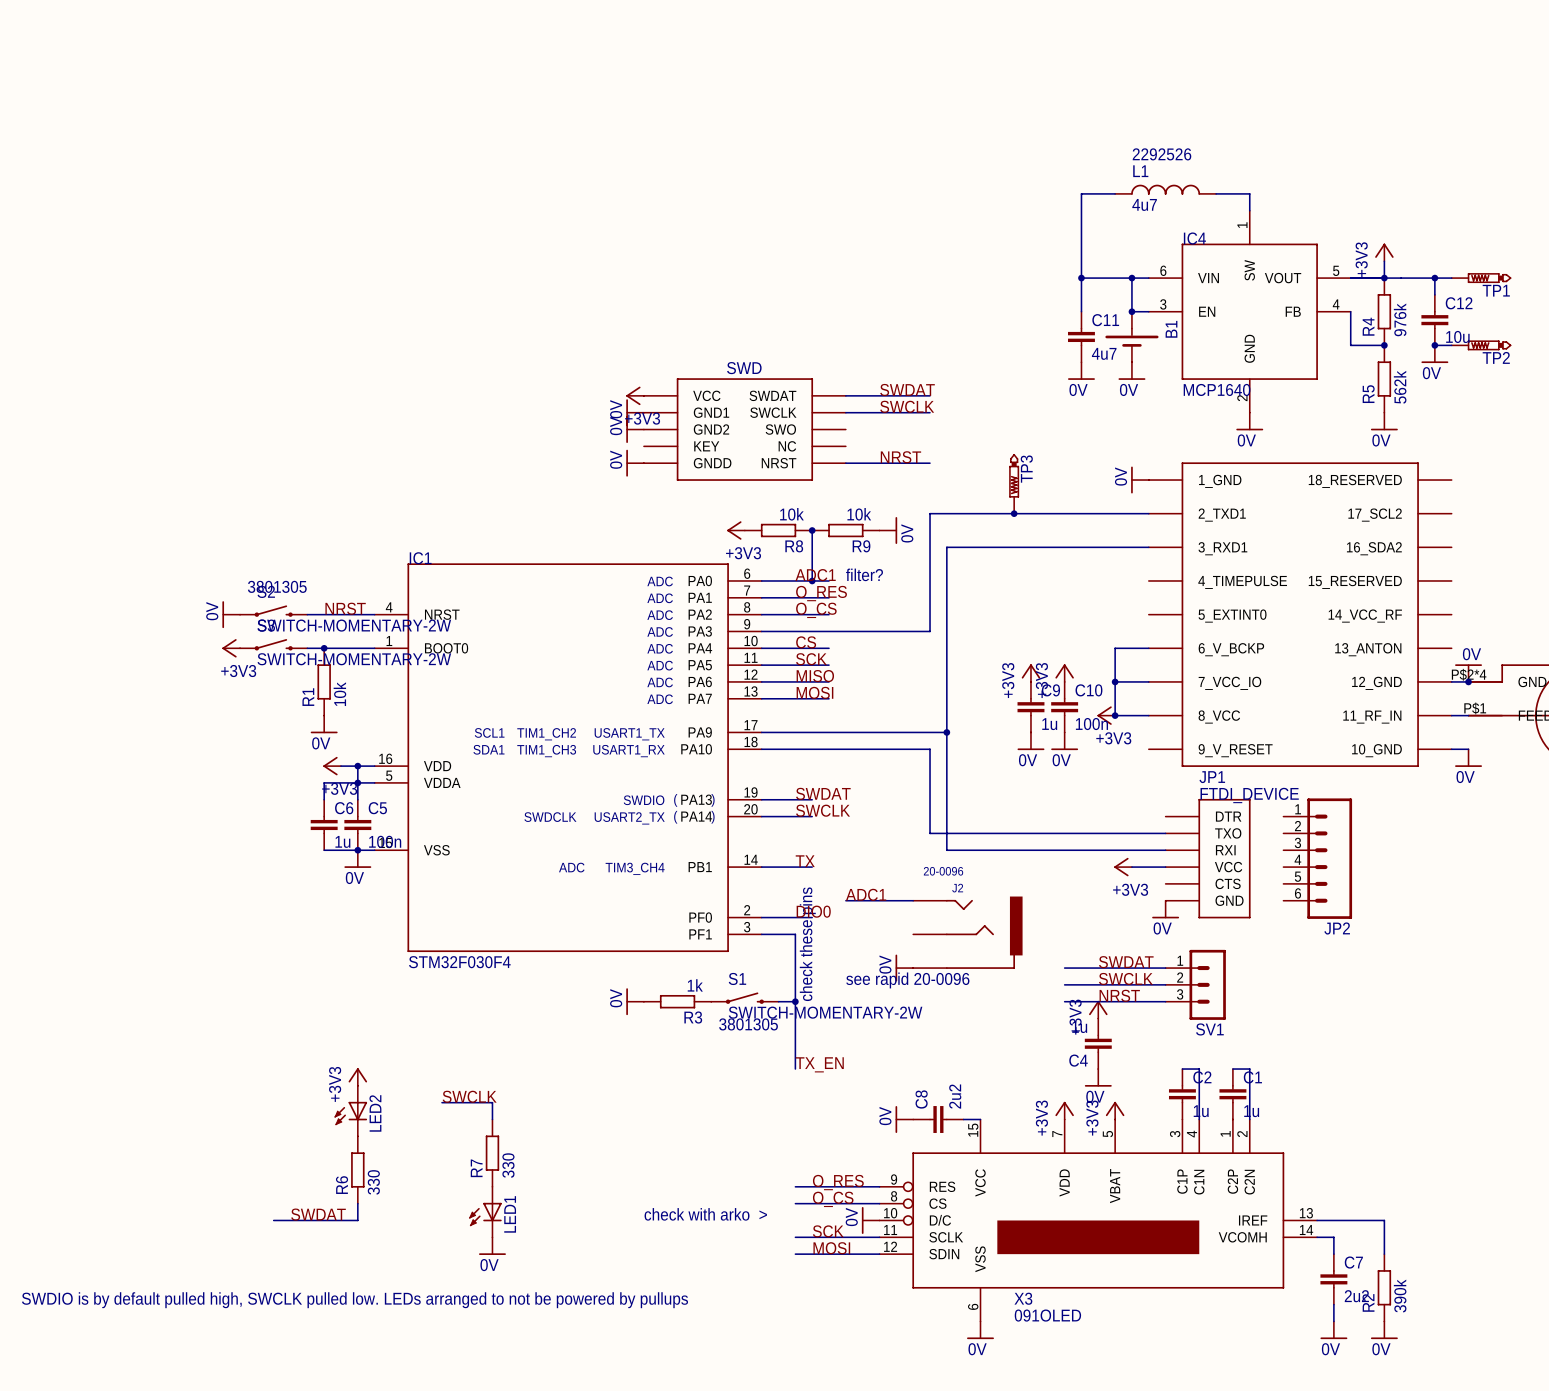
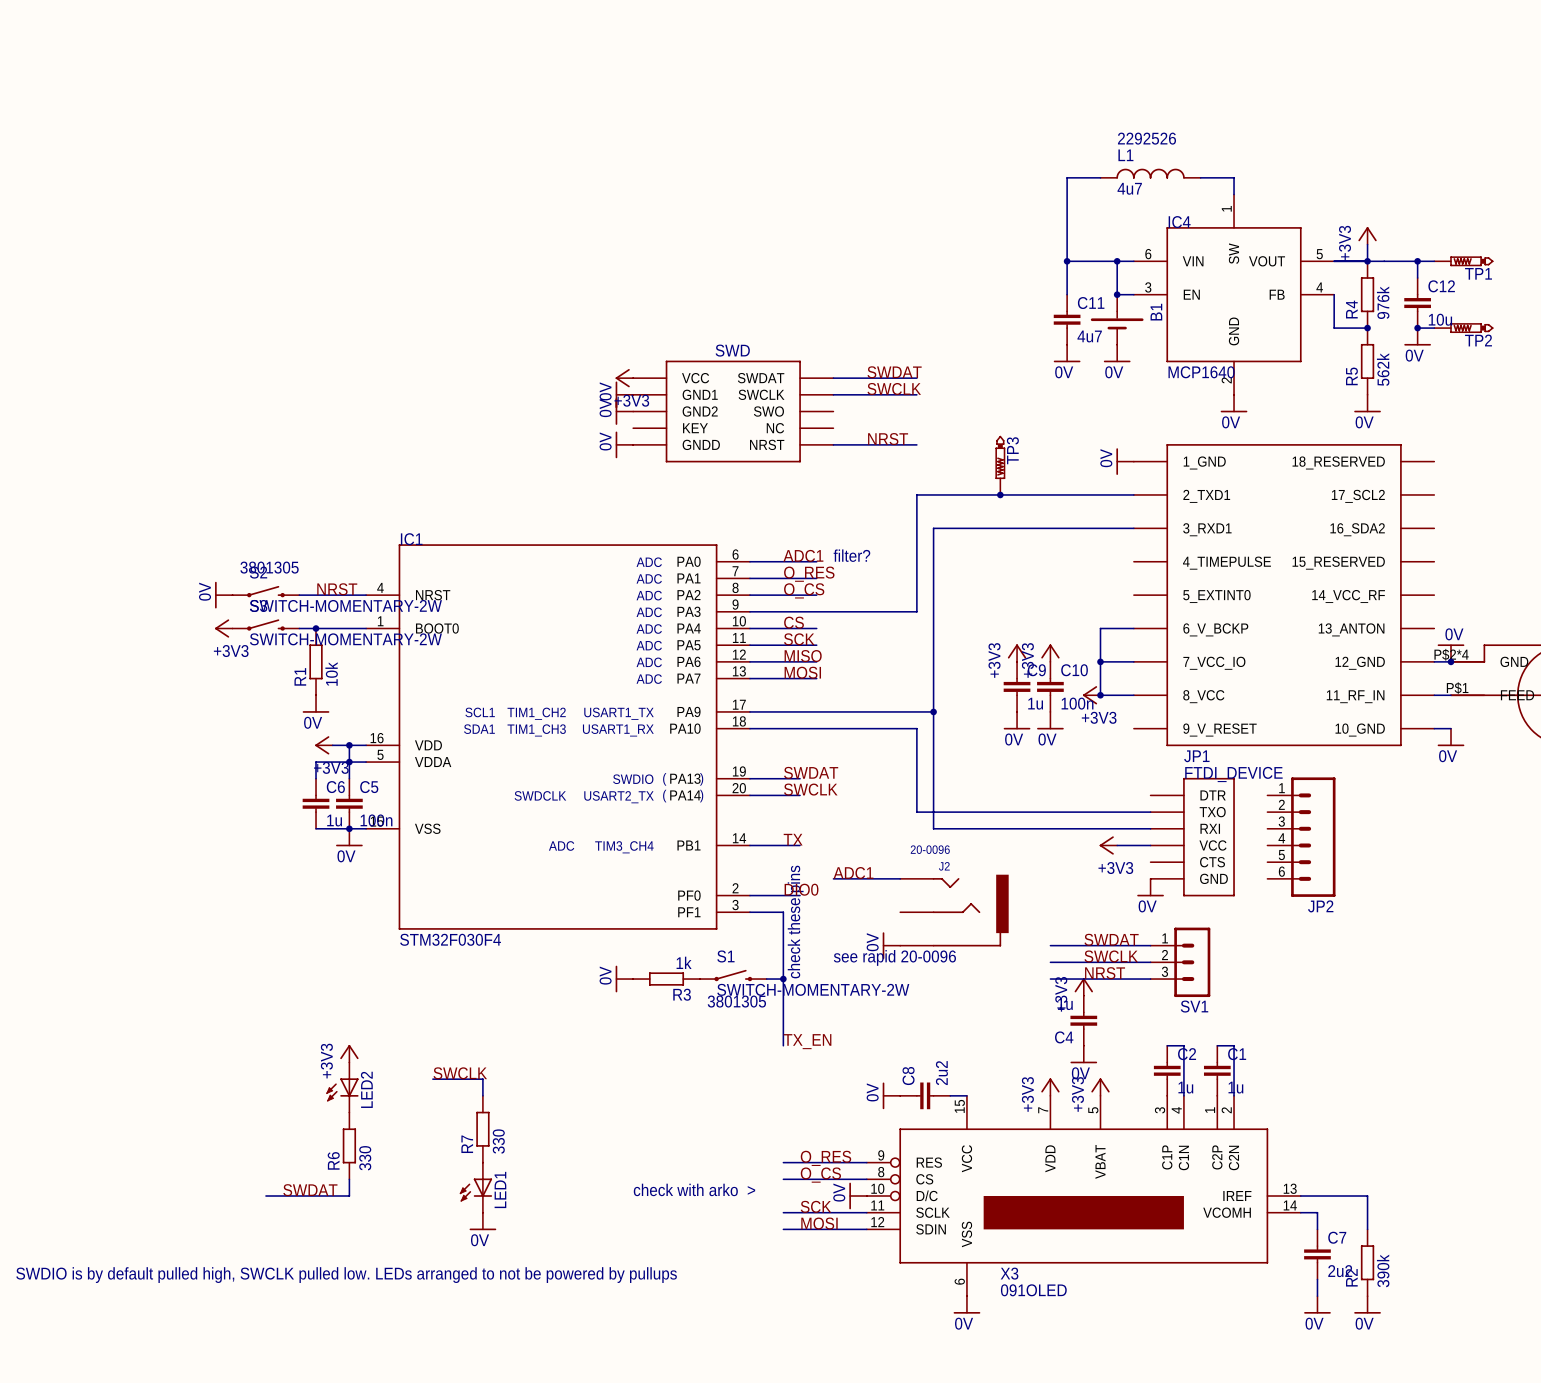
power symbol: +3V3 (736, 530) -> none
R8: 10k (778, 530) -> none
wire: (812, 530) (812, 580) -> none
junction: (812, 530) -> none
R9: 10k (845, 530) -> none
power symbol: 0V (888, 530) -> none
junction: (812, 580) -> none

